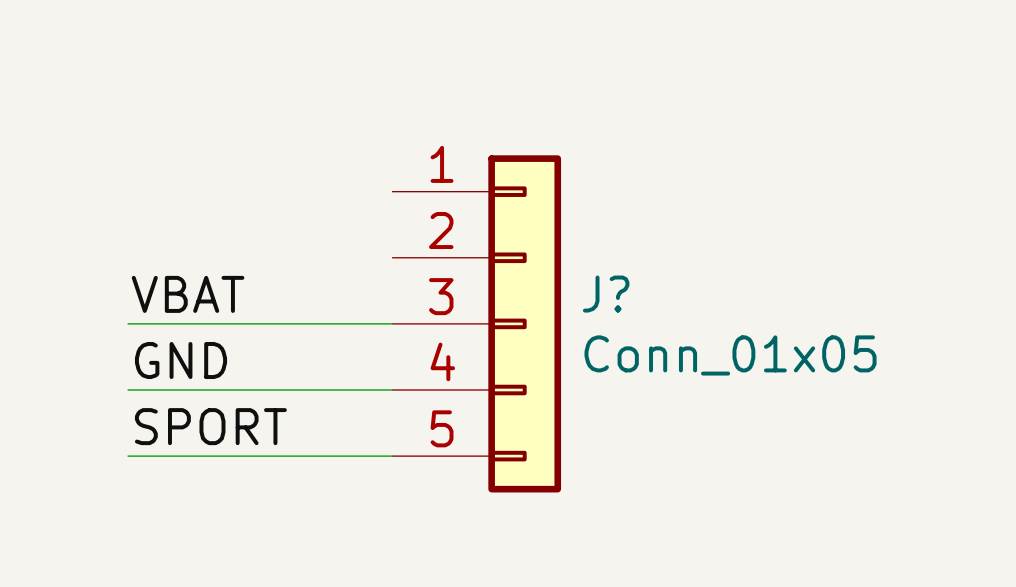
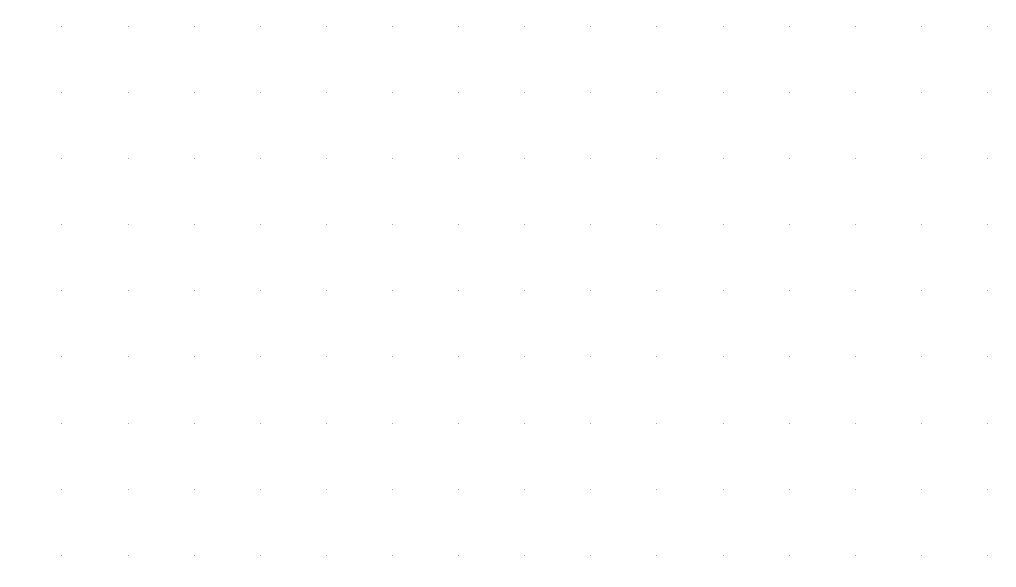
label: VBAT (188, 294) -> none
wire: (128, 323) (392, 323) -> none
J?: Conn_01x05 (476, 323) -> none
label: GND (181, 360) -> none
wire: (128, 390) (392, 390) -> none
label: SPORT (210, 426) -> none
wire: (128, 456) (392, 456) -> none

